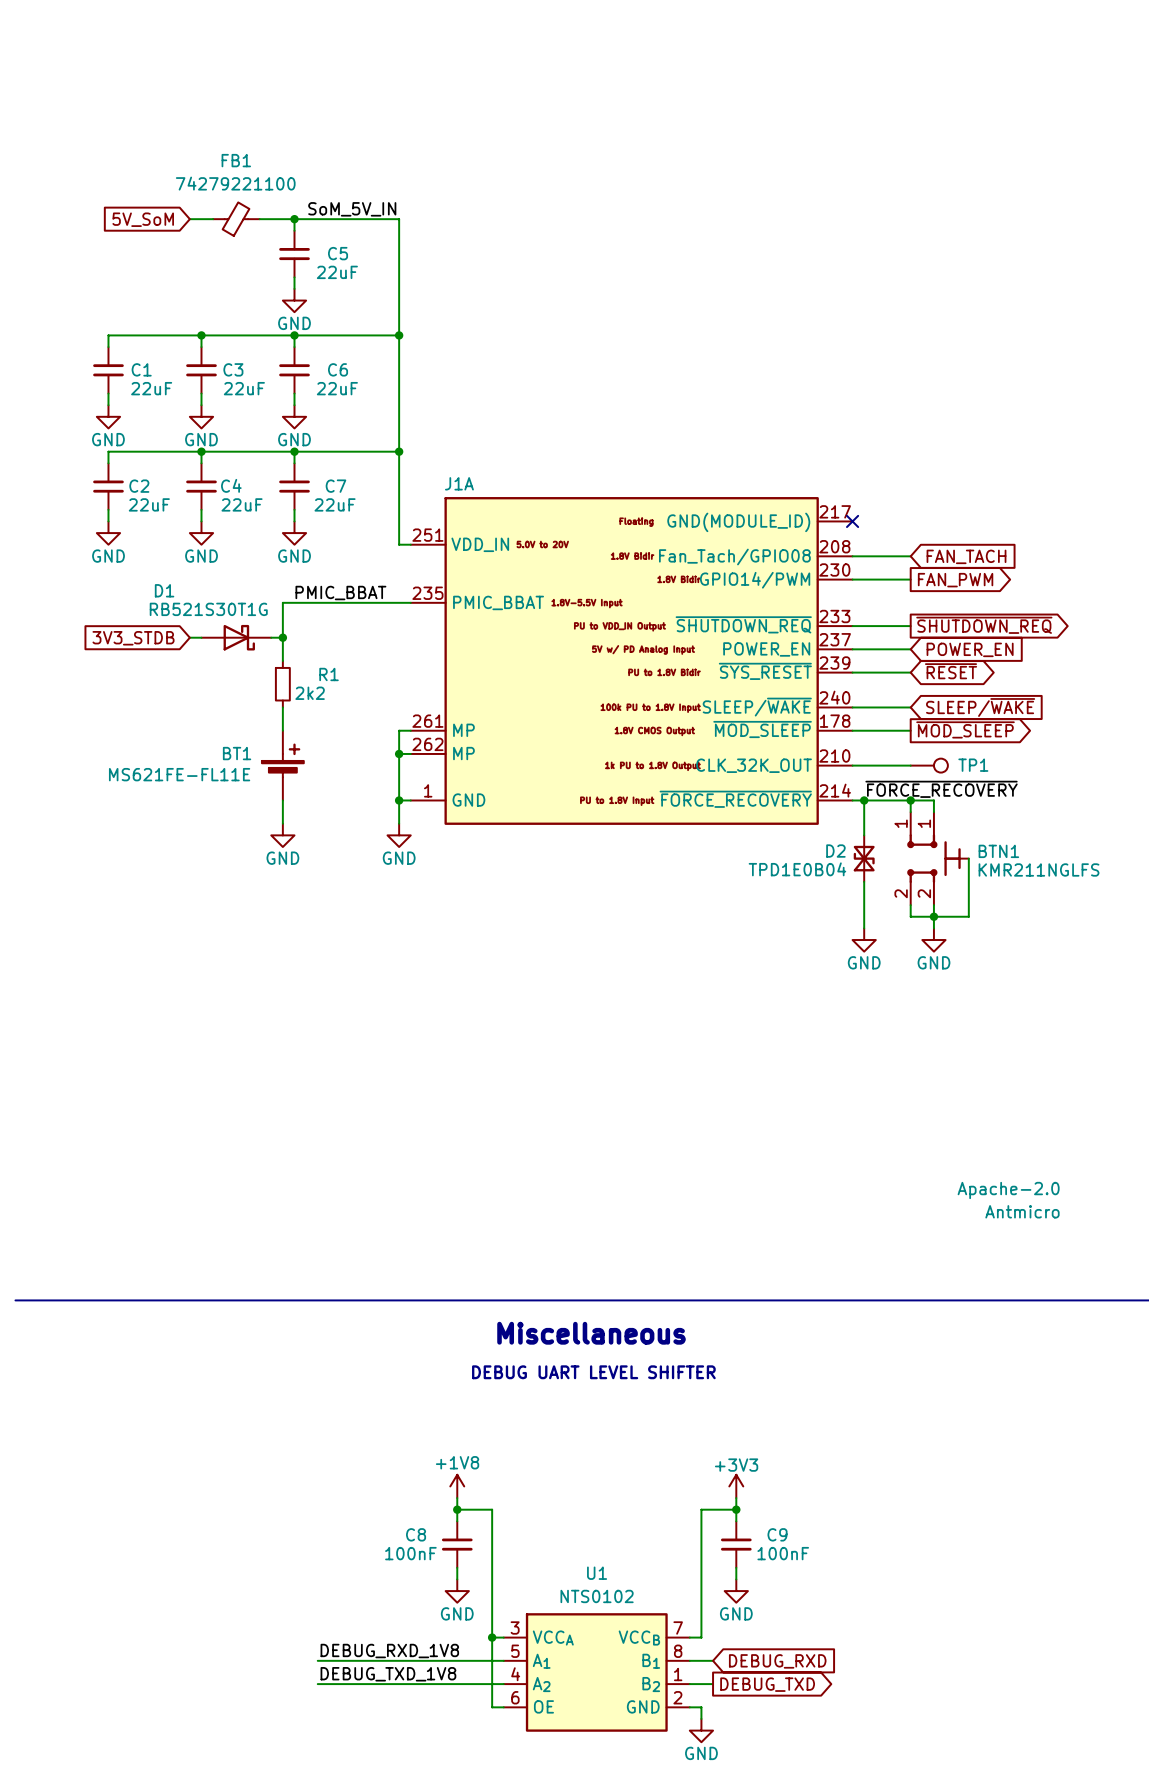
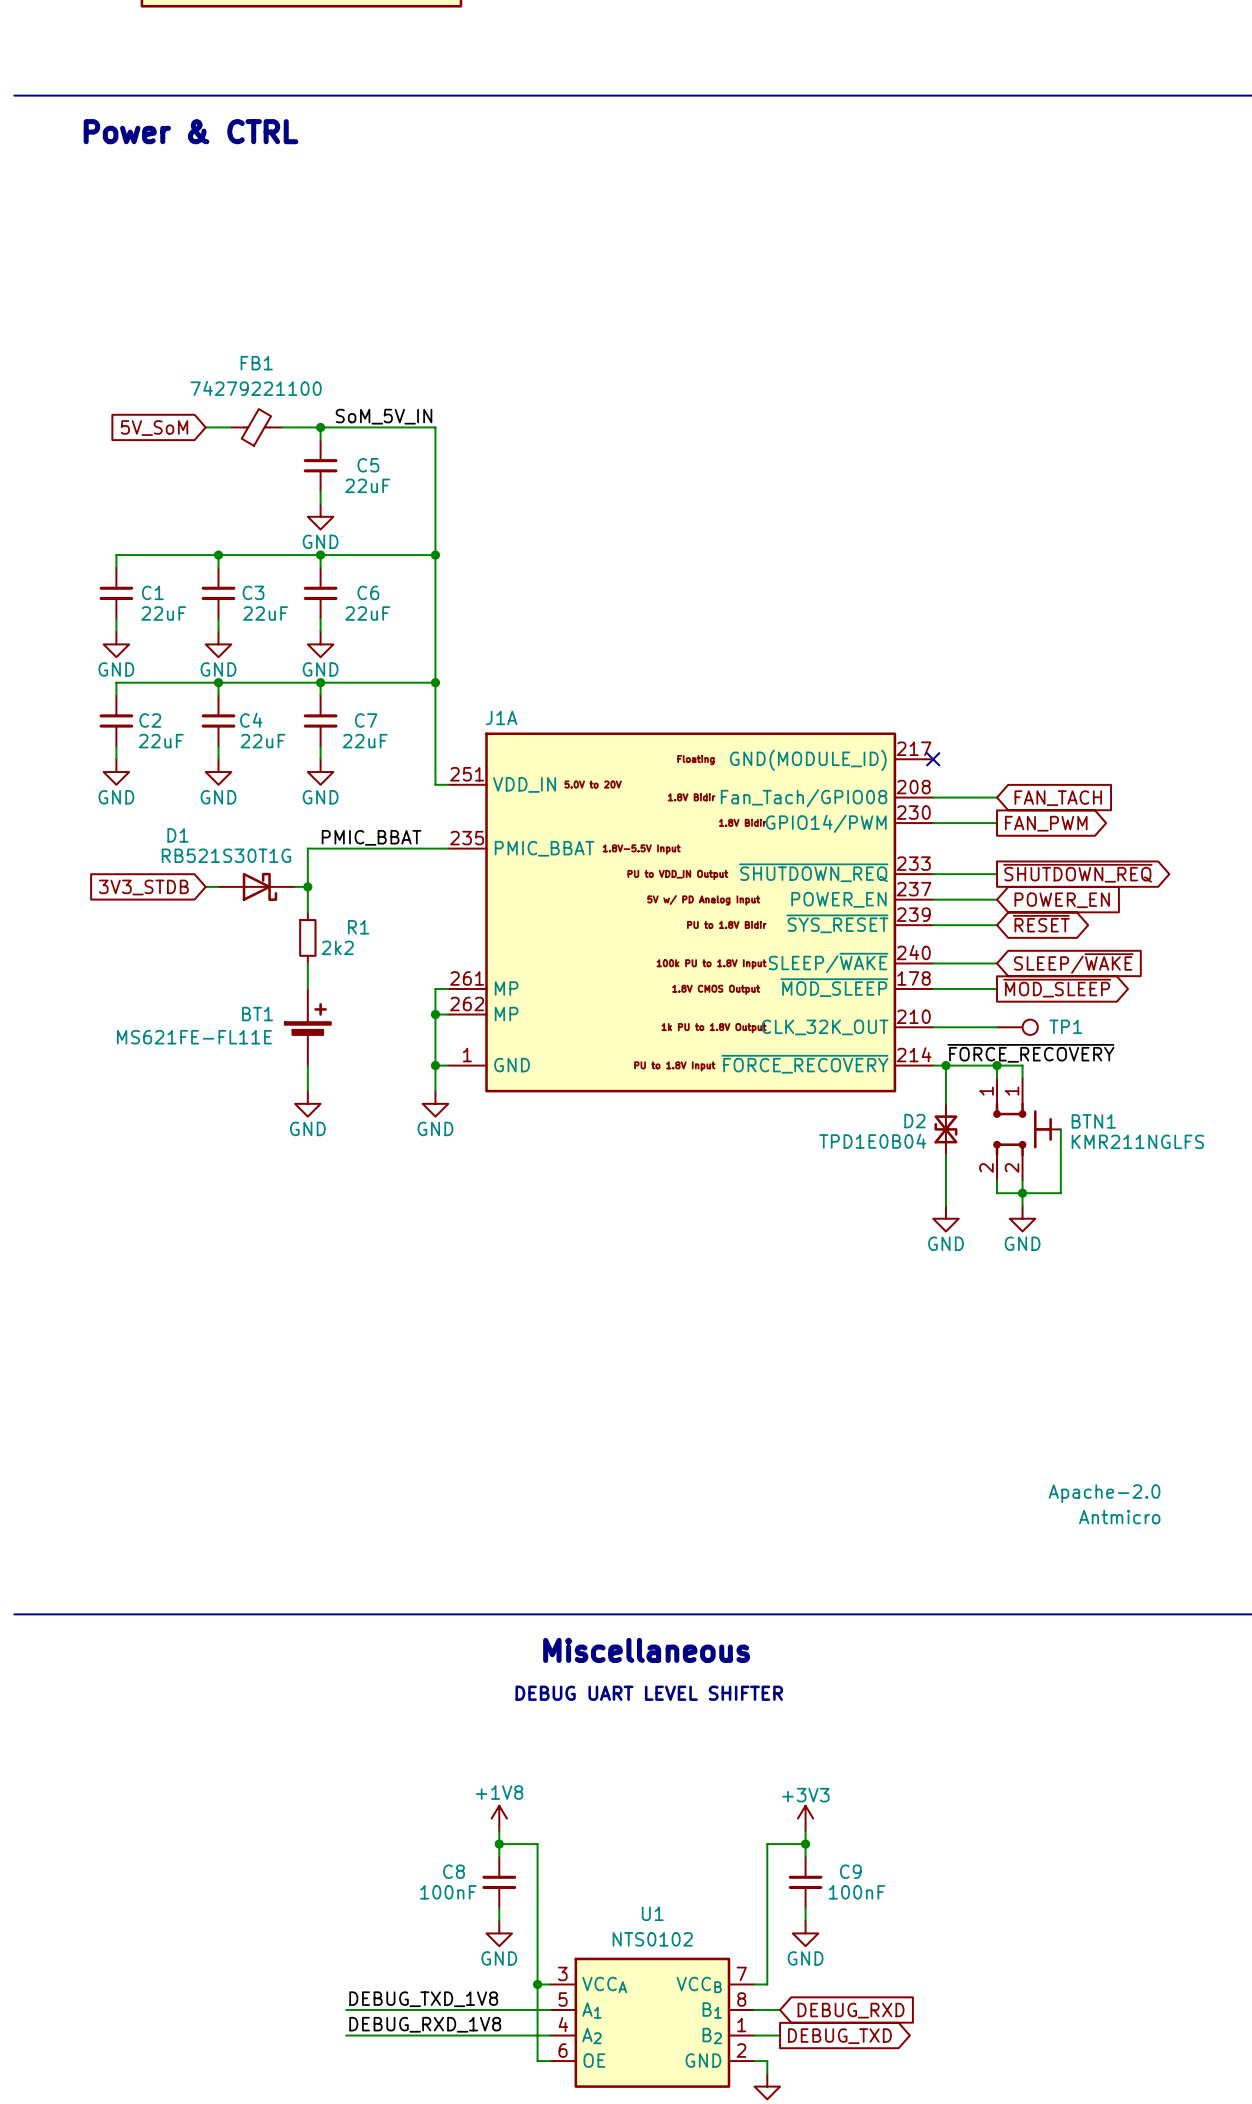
label: DEBUG_RXD_1V8 (389, 1651) -> DEBUG_TXD_1V8 (423, 1999)
label: DEBUG_TXD_1V8 (388, 1674) -> DEBUG_RXD_1V8 (425, 2024)

